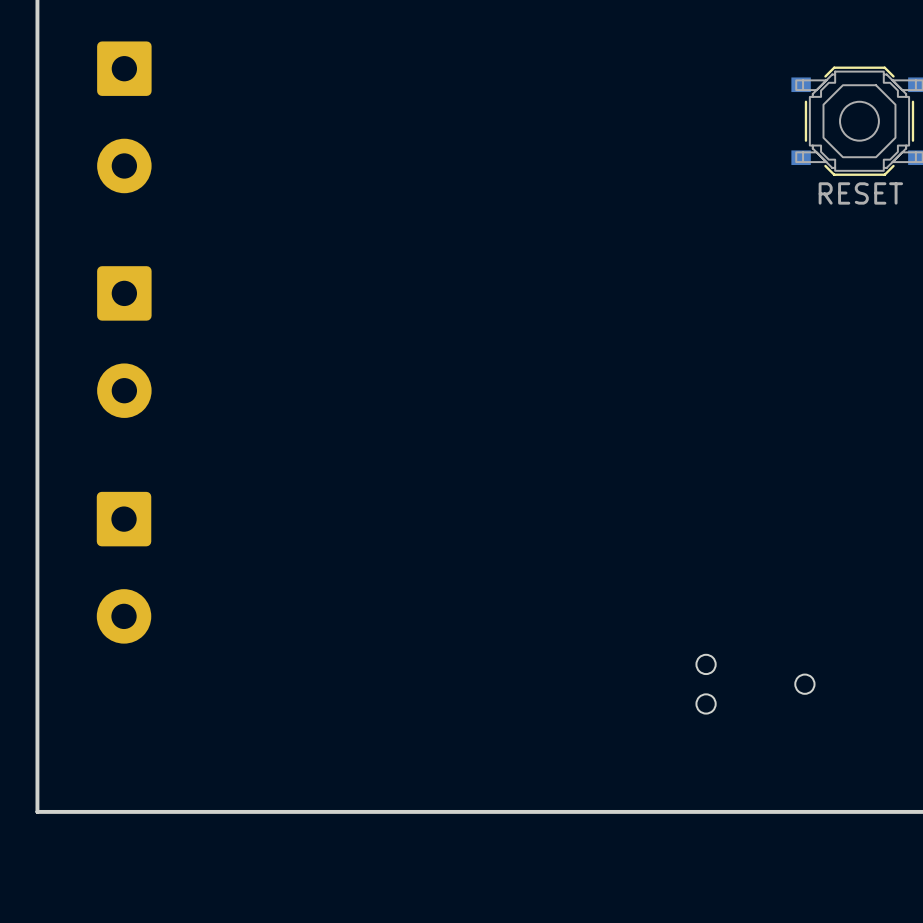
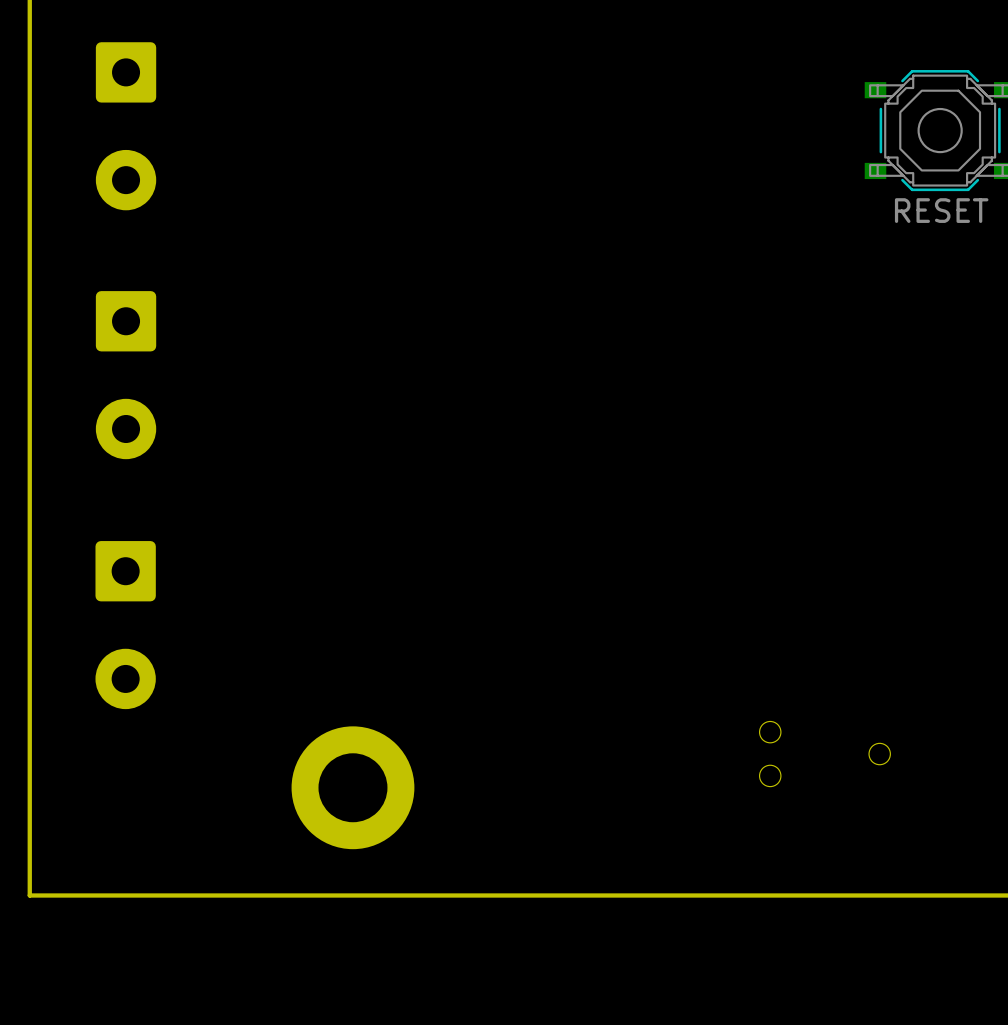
part: none -> (352, 787)

